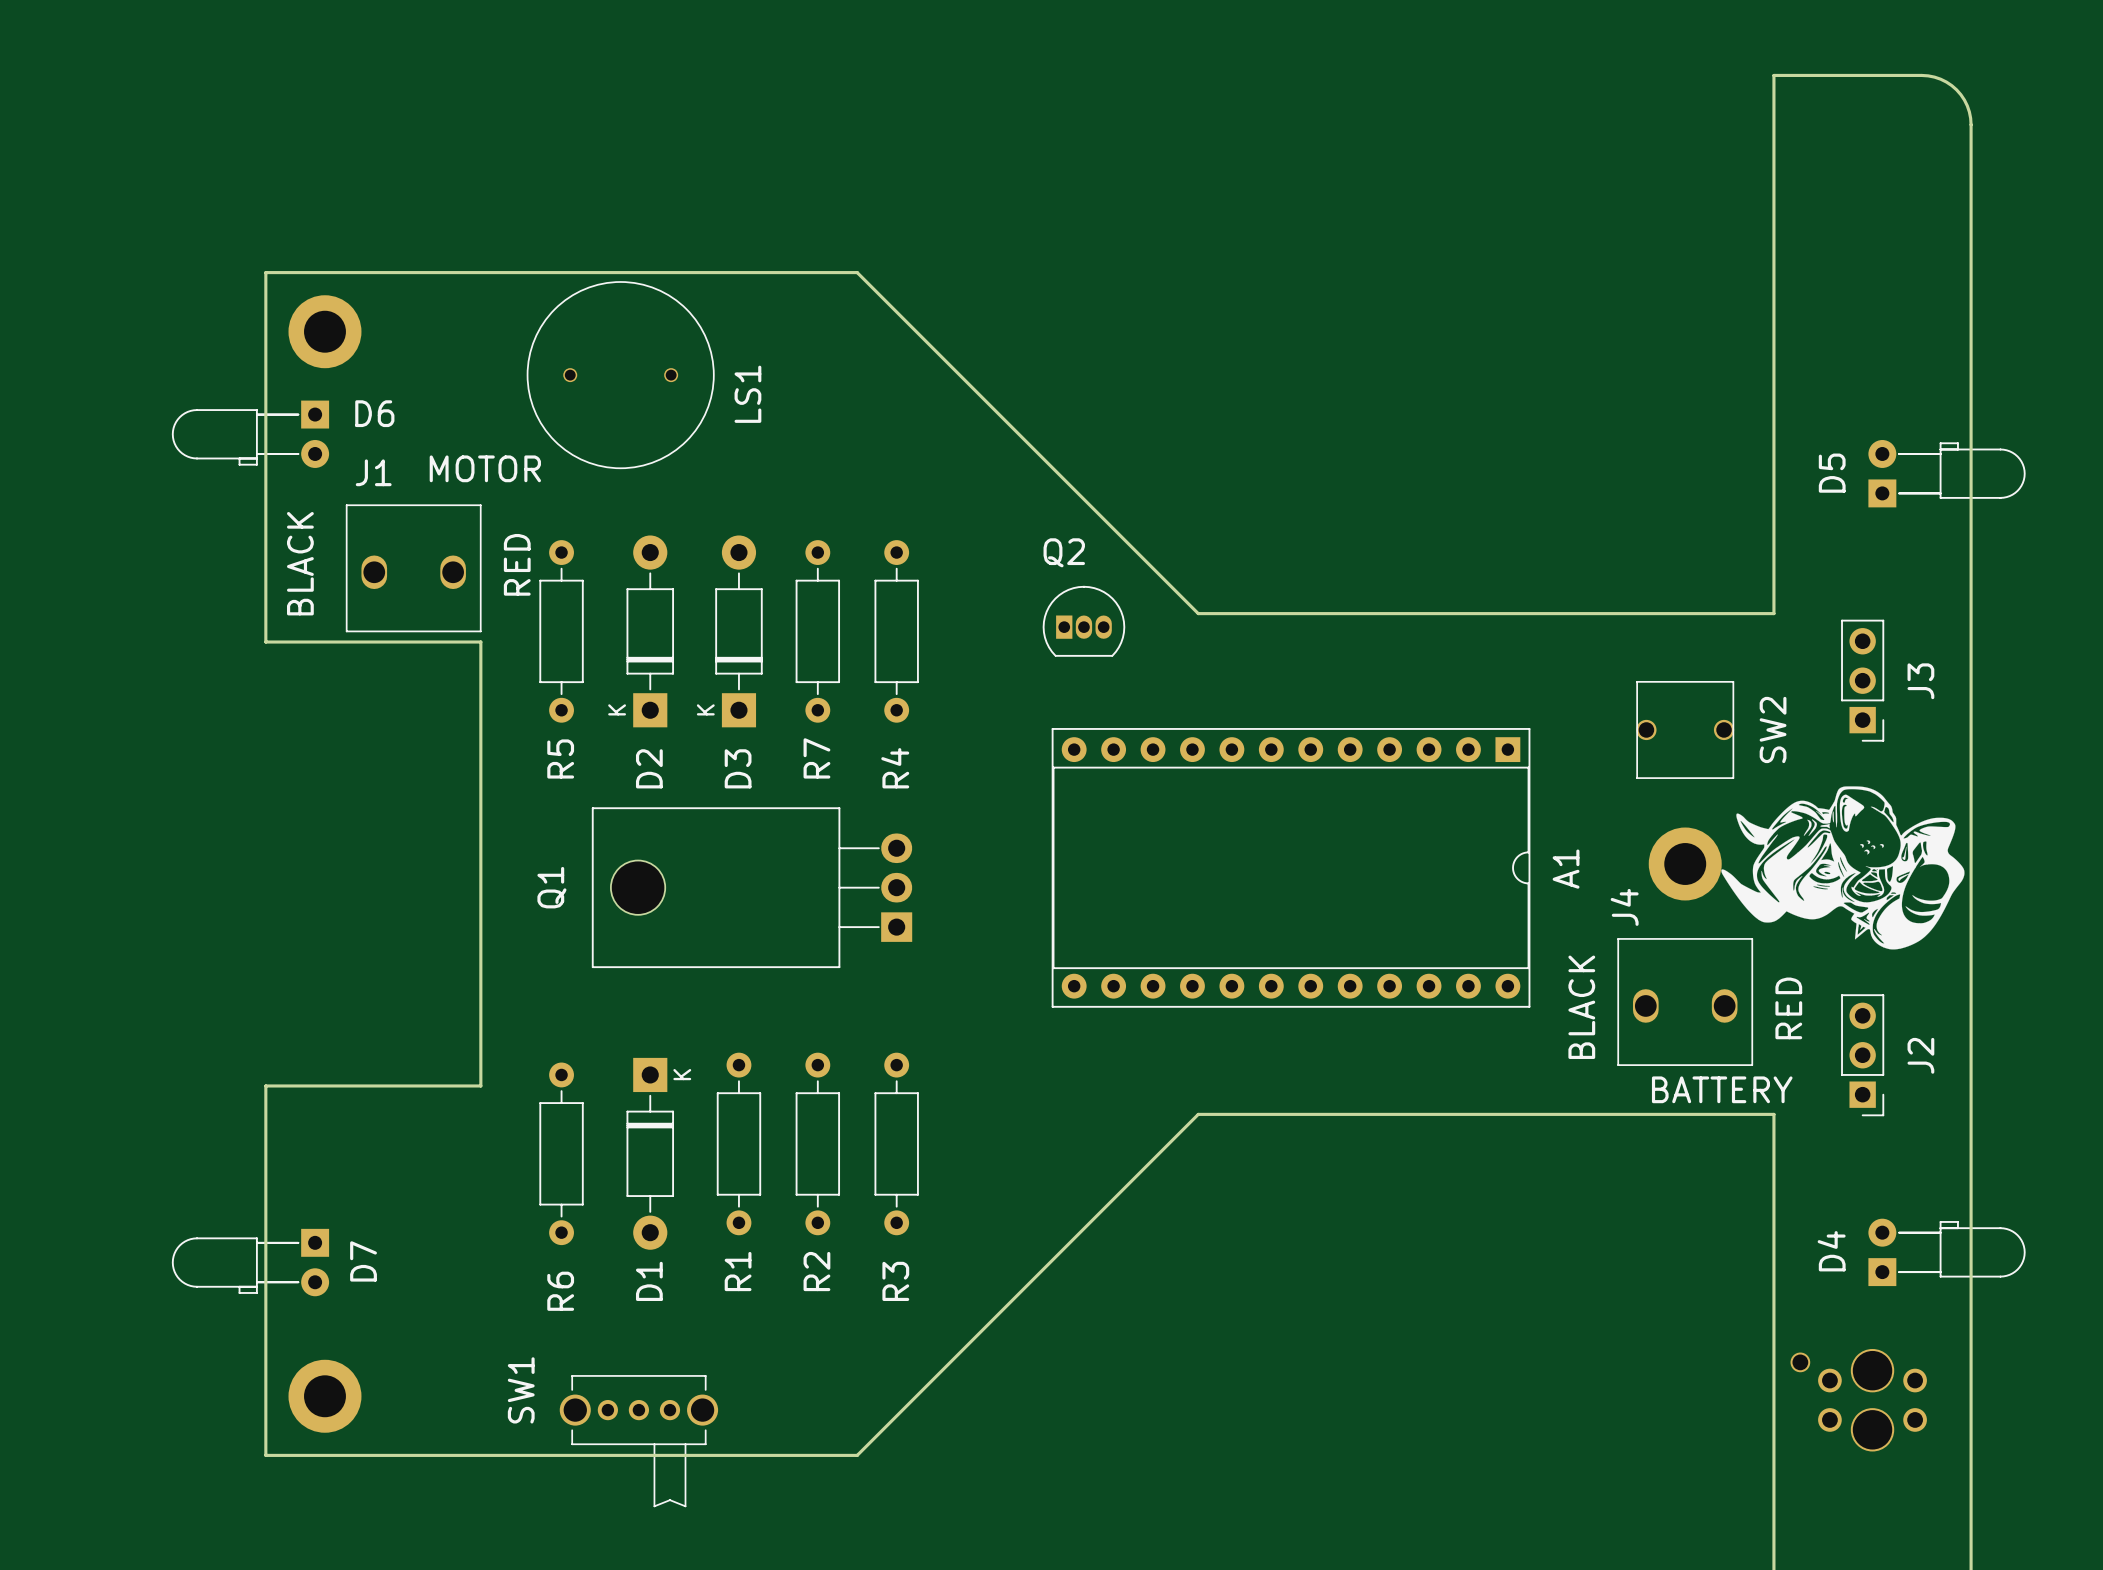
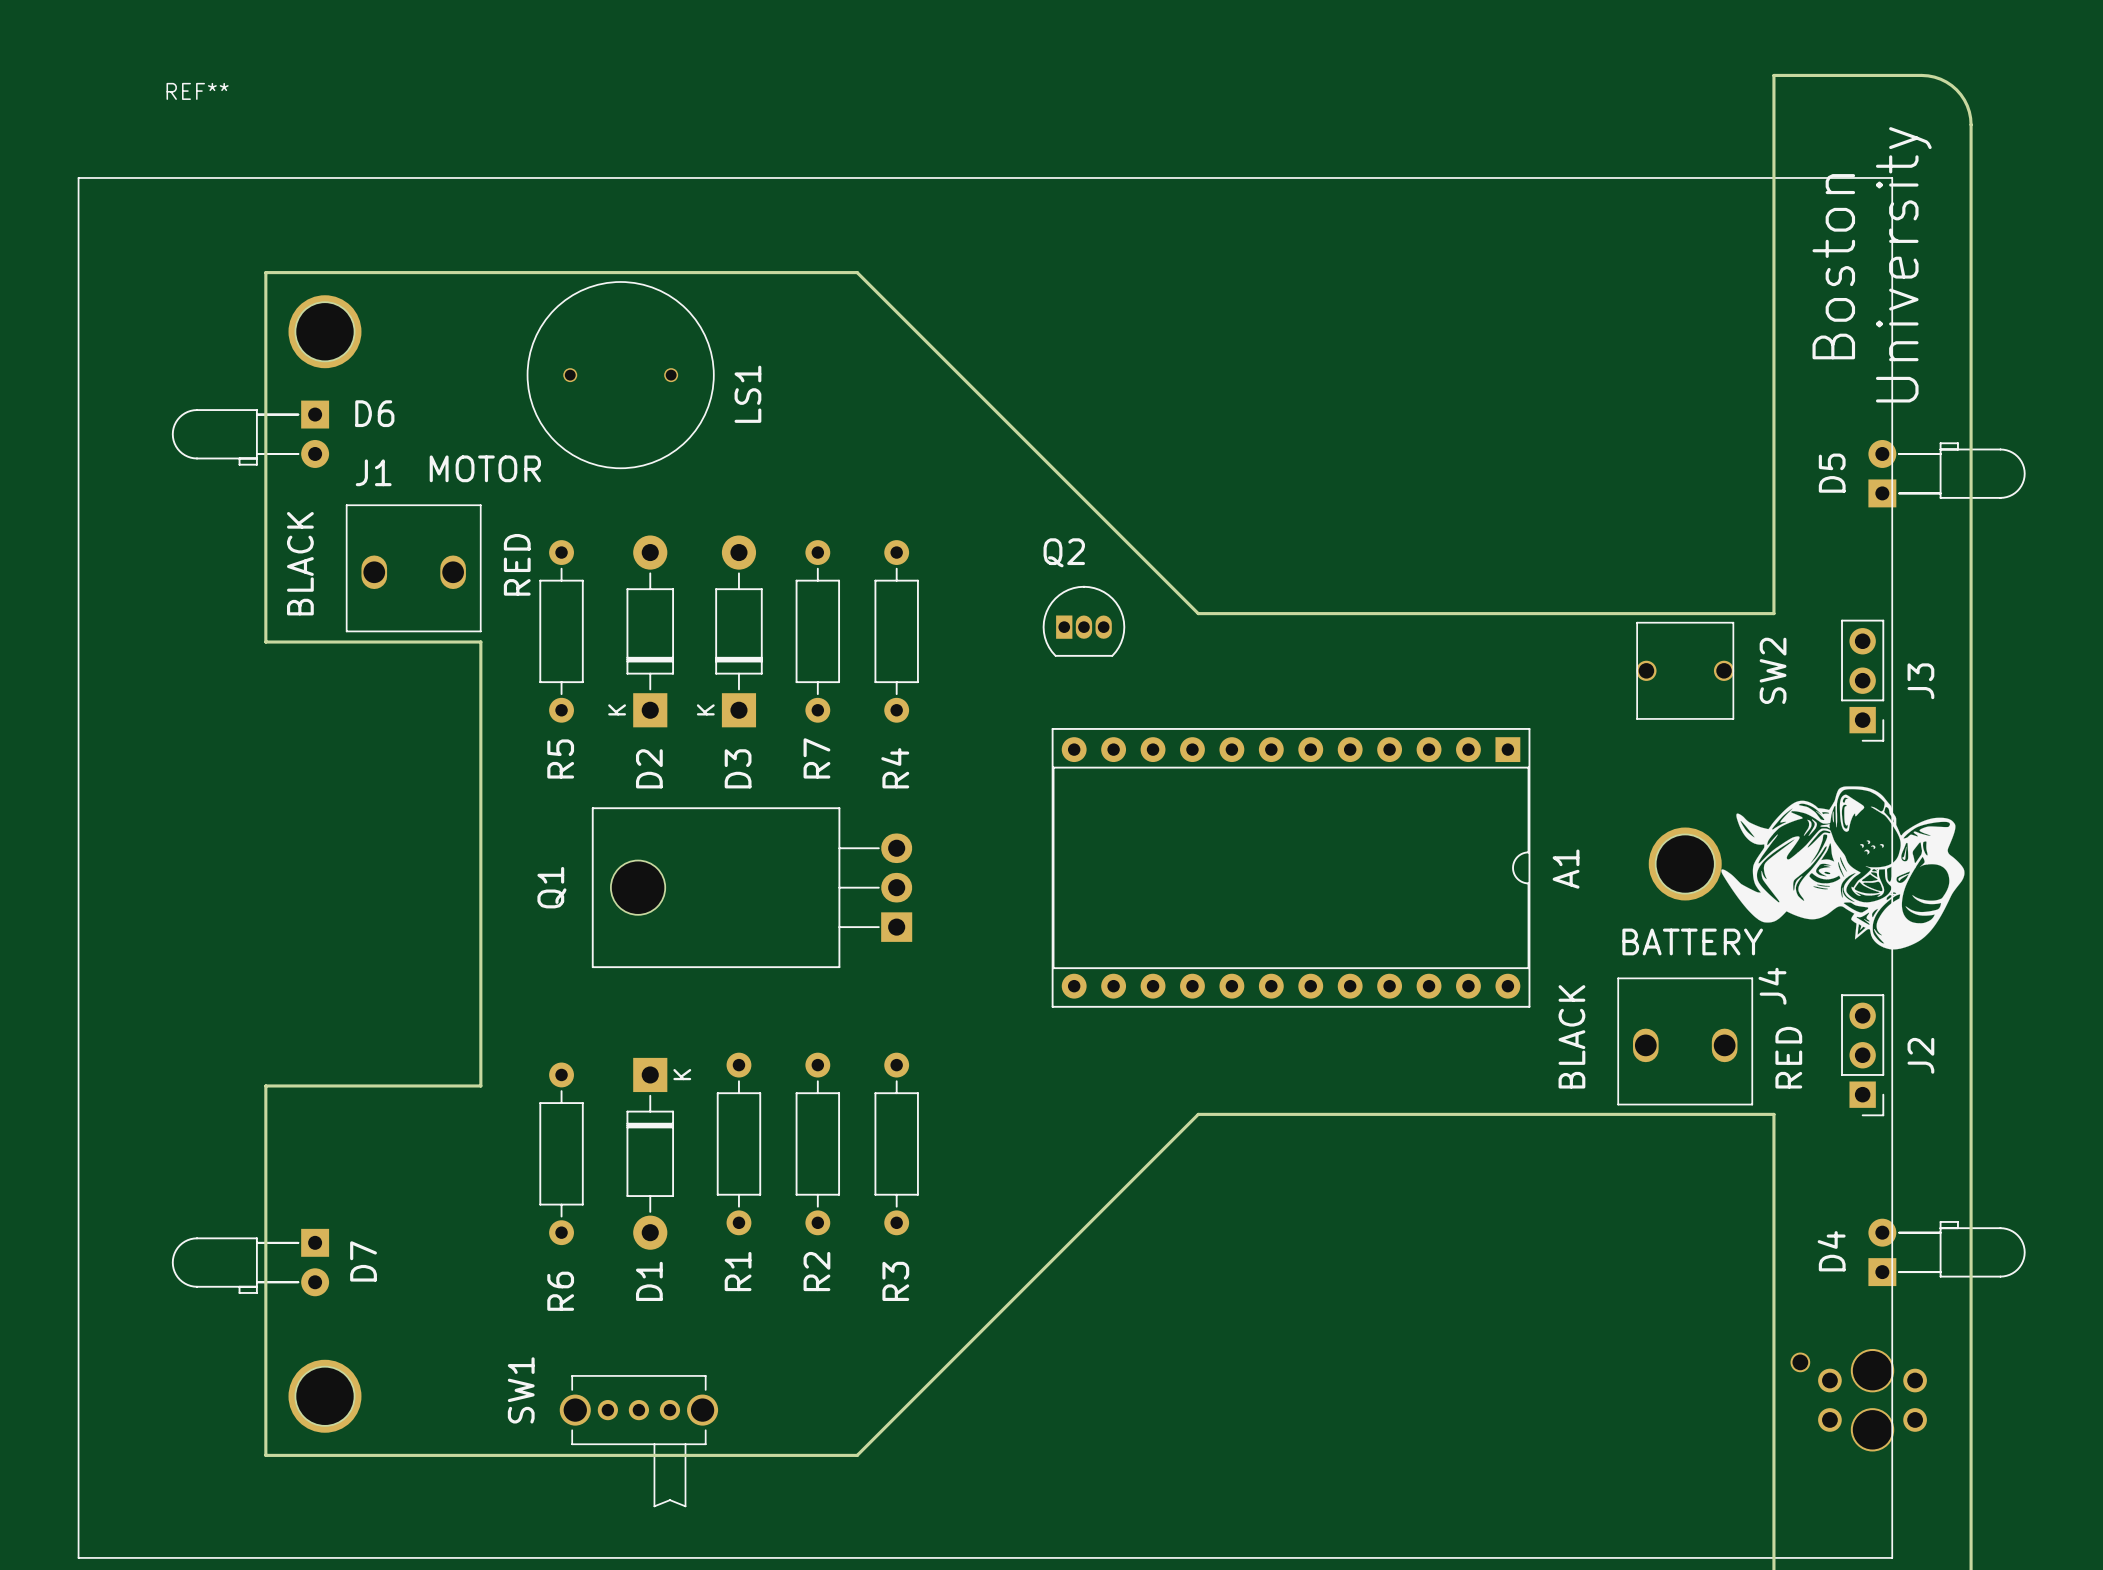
text: none -> University (1903, 264)
text: none -> Boston (1833, 266)
SW2 position: (1685, 729) -> (1685, 670)
REF**: none -> (985, 867)
J4 name position: J4 (1624, 907) -> J4 (1772, 986)
J4 position: (1685, 1002) -> (1685, 1041)
text position: BLACK (1581, 1007) -> BLACK (1571, 1036)
text position: RED (1788, 1008) -> RED (1788, 1057)
text position: BATTERY (1722, 1089) -> BATTERY (1692, 941)

